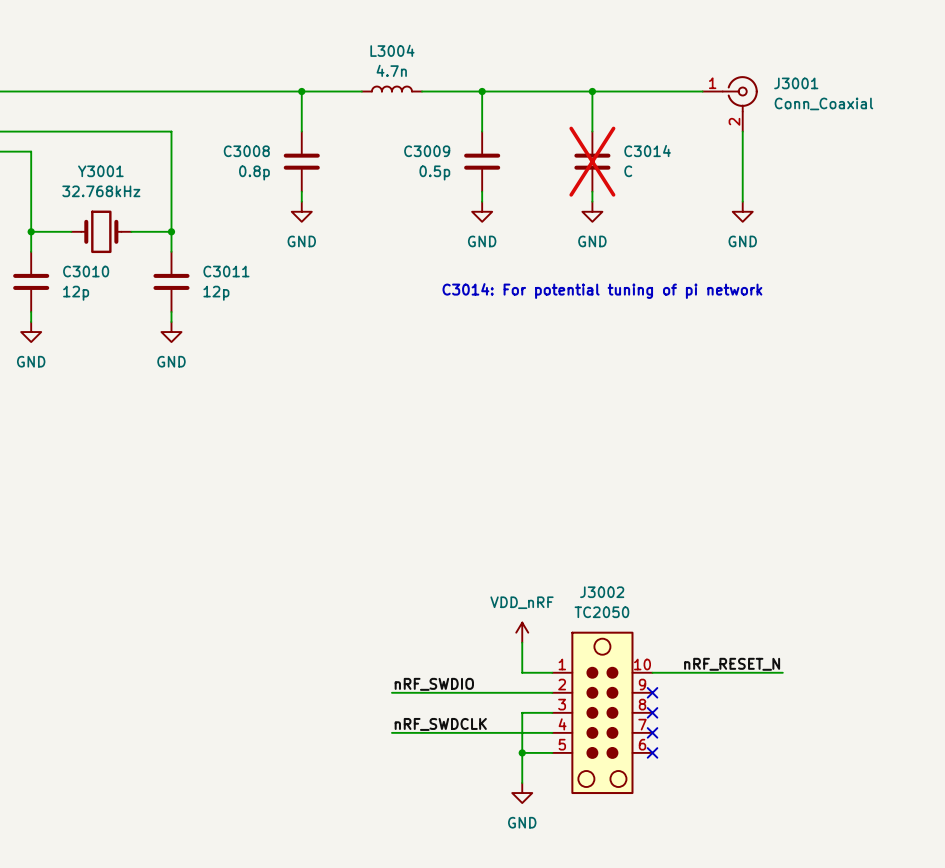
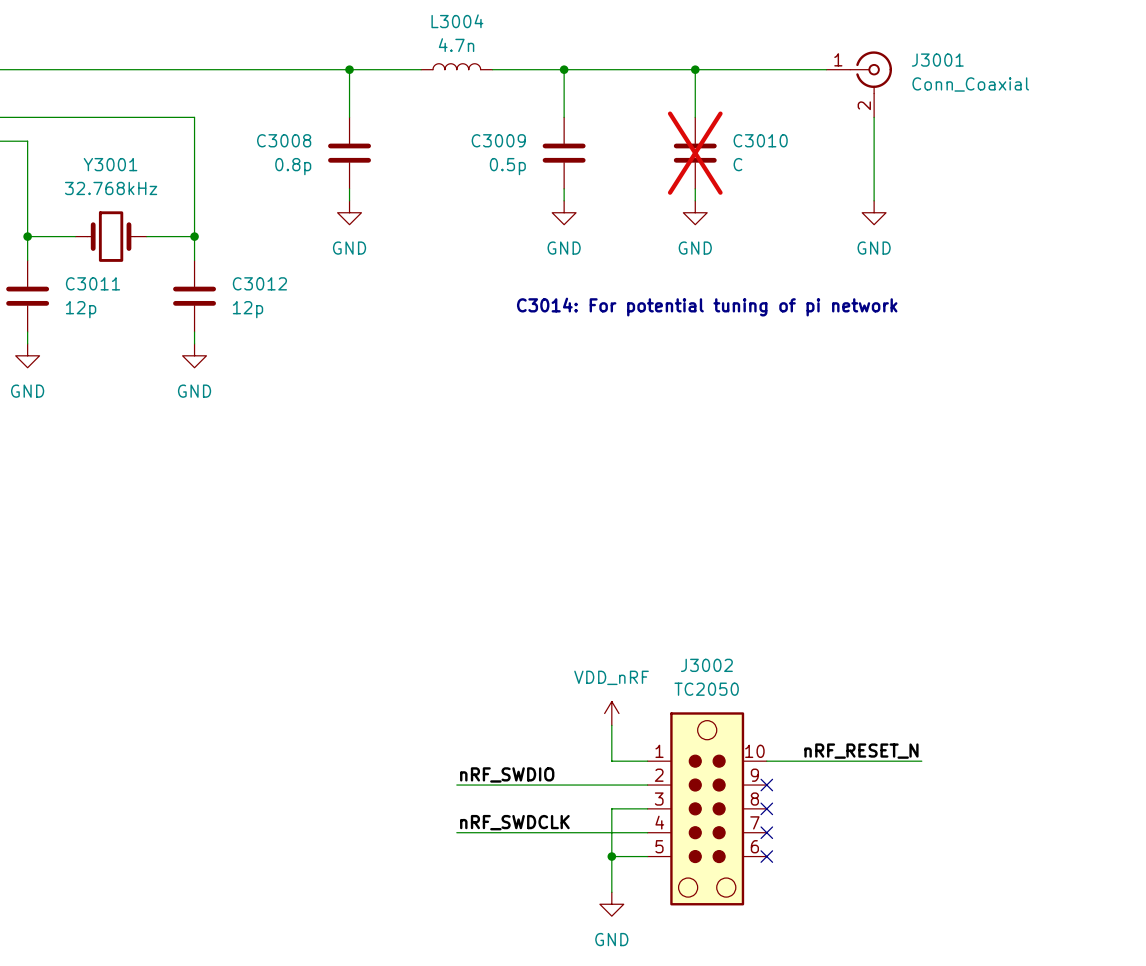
C3014 name: C3014 (647, 151) -> C3010 (760, 140)
C3010 name: C3010 (86, 271) -> C3011 (93, 283)
C3011 name: C3011 (226, 271) -> C3012 (259, 283)

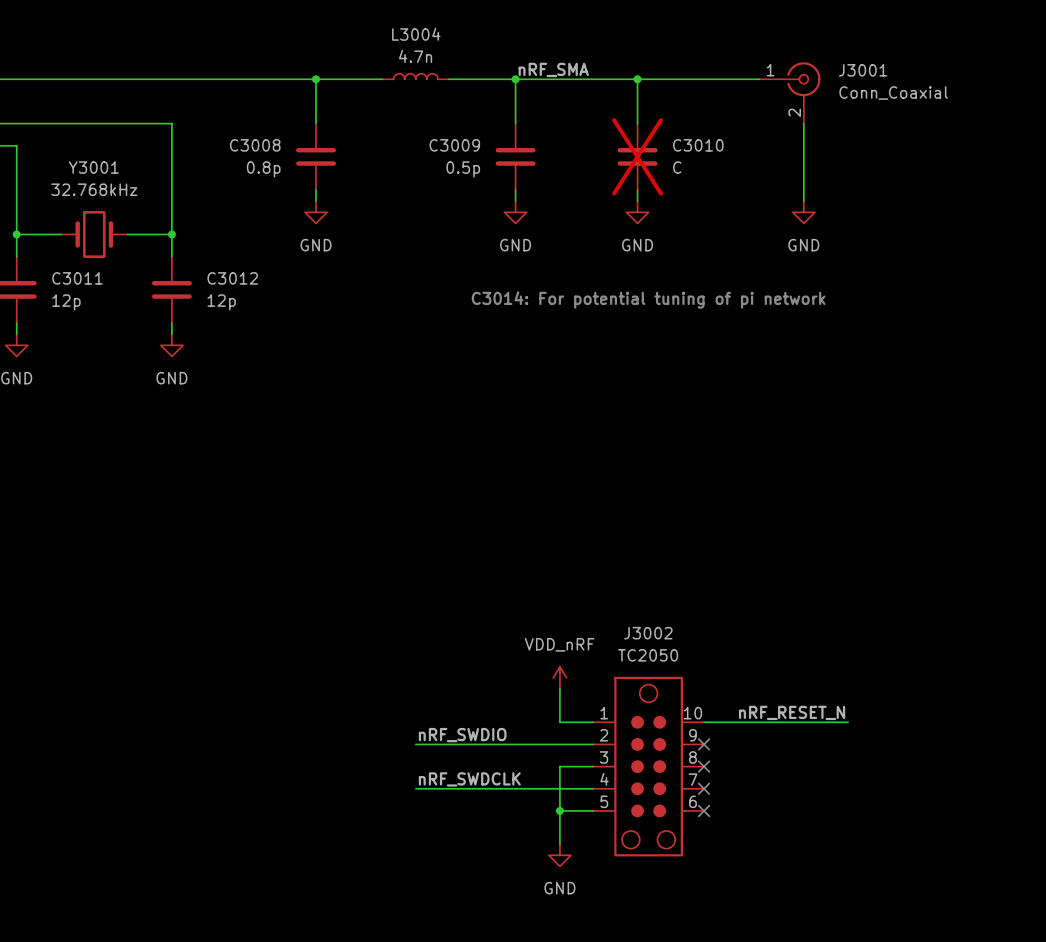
label: none -> nRF_SMA (553, 69)

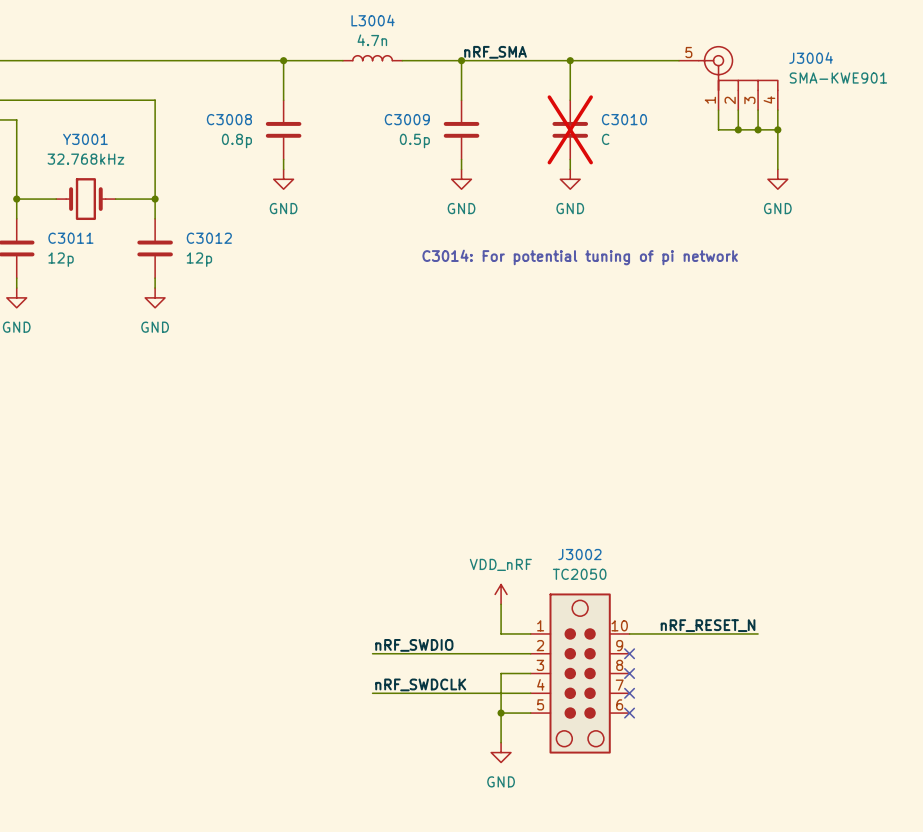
J3001: Conn_Coaxial (789, 92) -> none
J3004: none -> SMA-KWE901 (728, 78)
wire: none -> (738, 110) (738, 129)
wire: none -> (758, 110) (758, 129)
wire: none -> (777, 110) (777, 169)
wire: (803, 156) (803, 201) -> (718, 129) (777, 129)
junction: none -> (738, 129)
junction: none -> (758, 129)
junction: none -> (777, 129)
power symbol position: GND (803, 212) -> GND (777, 179)

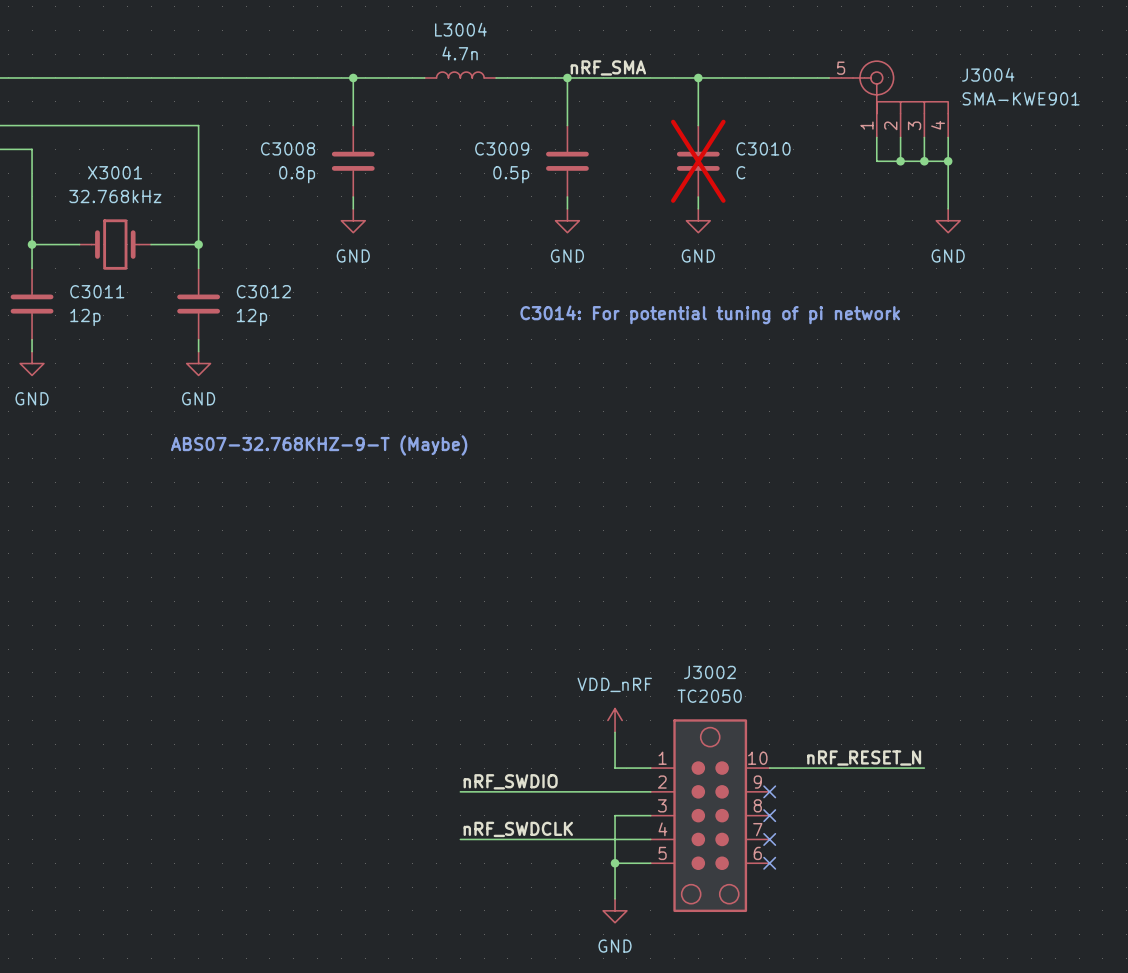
Y3001 name: Y3001 (85, 139) -> X3001 (115, 172)
text: none -> ABS07-32.768KHZ-9-T (Maybe) (319, 445)

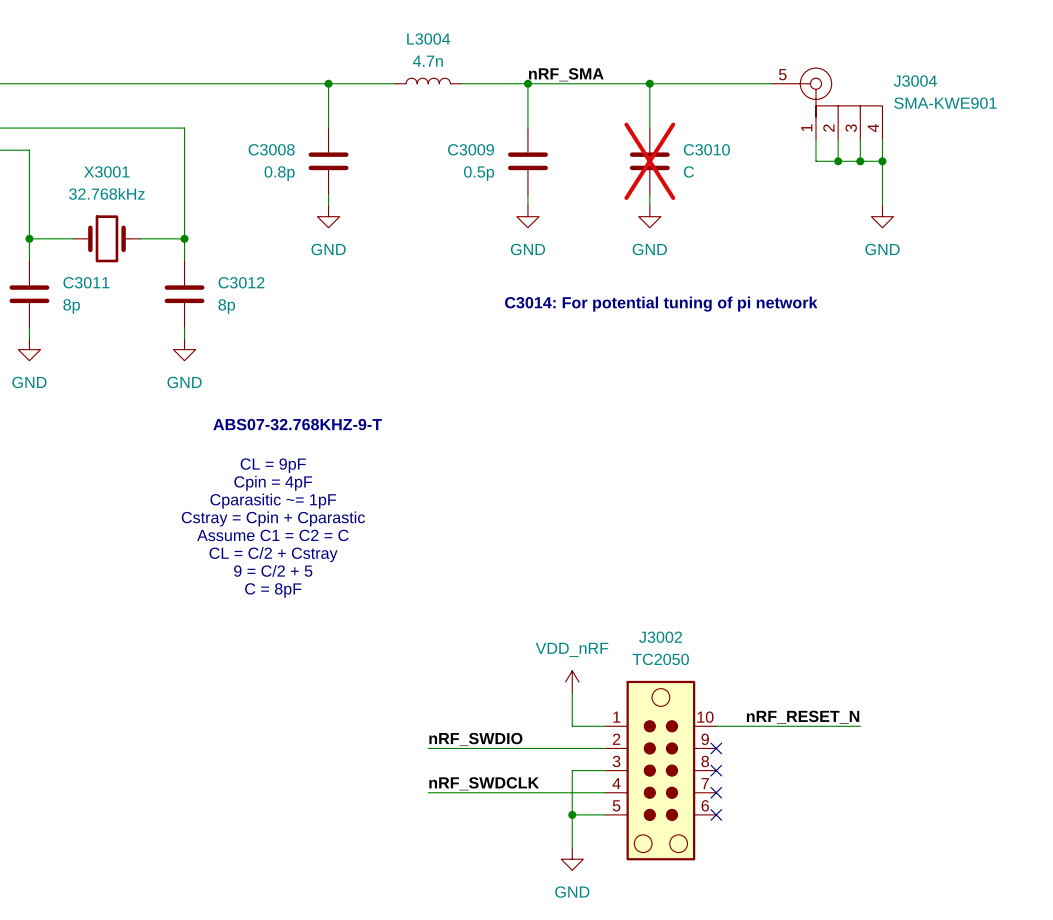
C3011 value: 12p (85, 317) -> 8p (71, 306)
C3012 value: 12p (251, 317) -> 8p (226, 306)
text: ABS07-32.768KHZ-9-T (Maybe) (319, 445) -> ABS07-32.768KHZ-9-T (297, 424)
text: none -> CL = 9pF (273, 465)
text: none -> Cpin = 4pF (273, 483)
text: none -> Cparasitic ~= 1pF (273, 501)
text: none -> Cstray = Cpin + Cparastic (273, 518)
text: none -> Assume C1 = C2 = C (272, 535)
text: none -> CL = C/2 + Cstray (273, 554)
text: none -> 9 = C/2 + 5 (273, 570)
text: none -> C = 8pF (273, 590)

